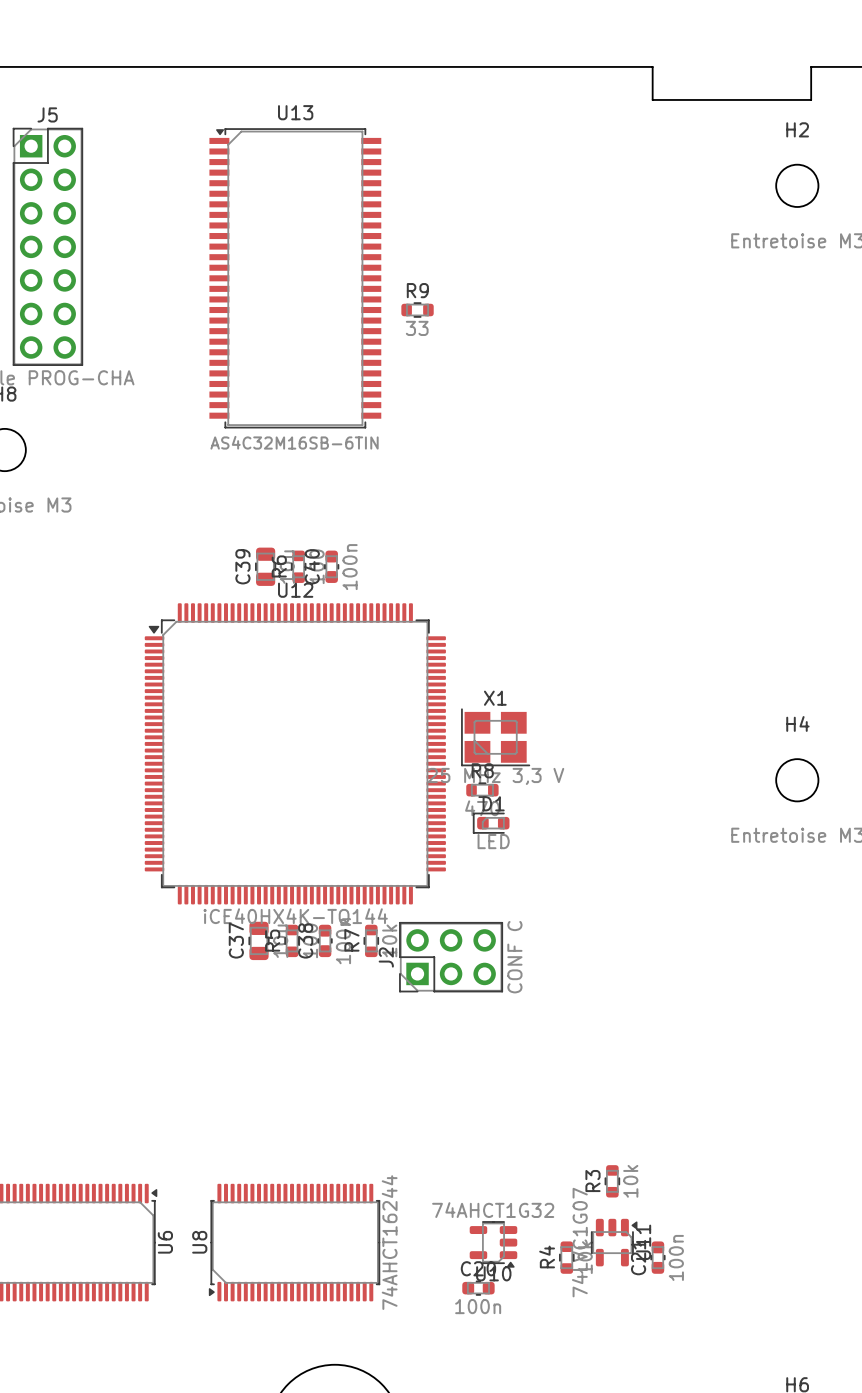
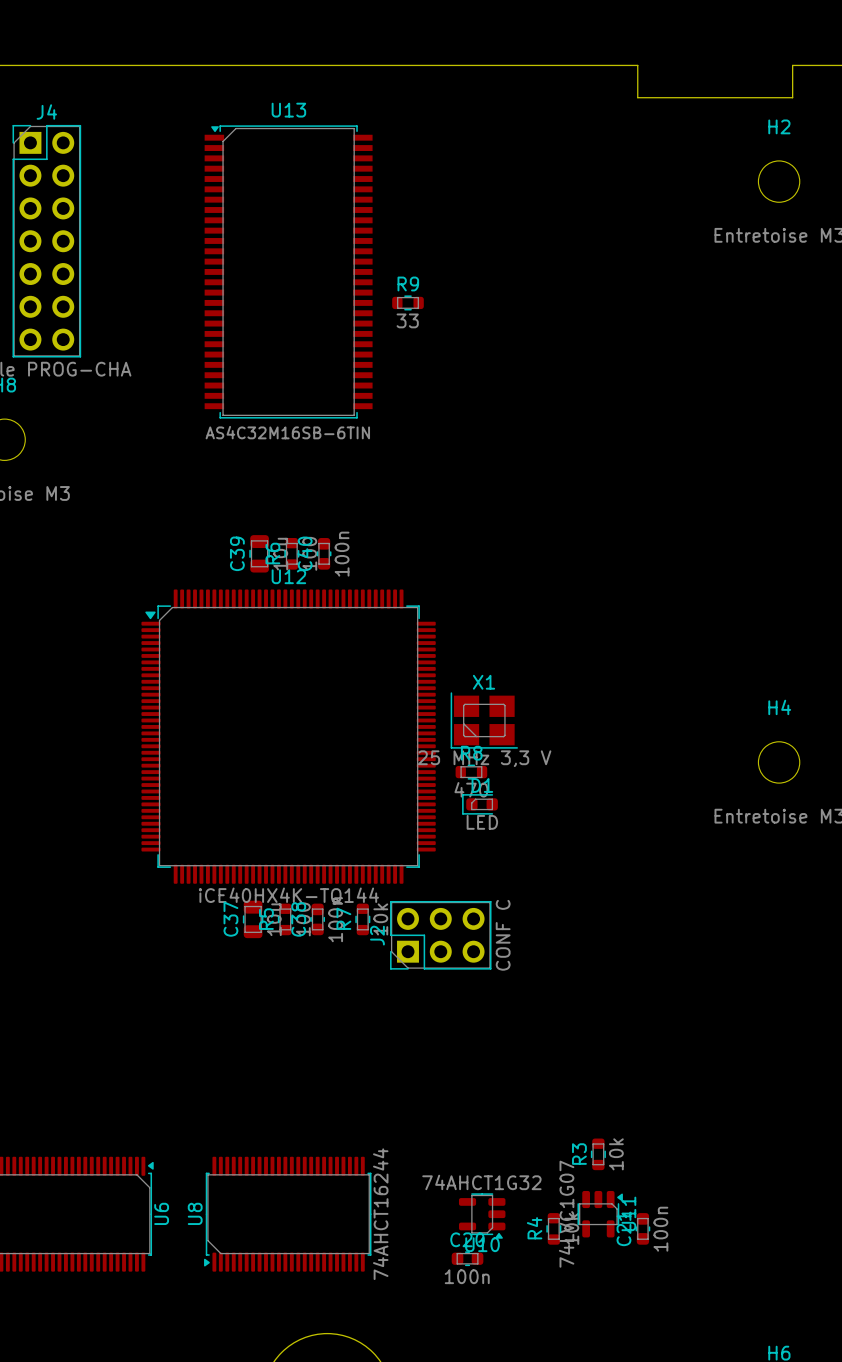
J5 name: J5 (47, 114) -> J4 (46, 112)

